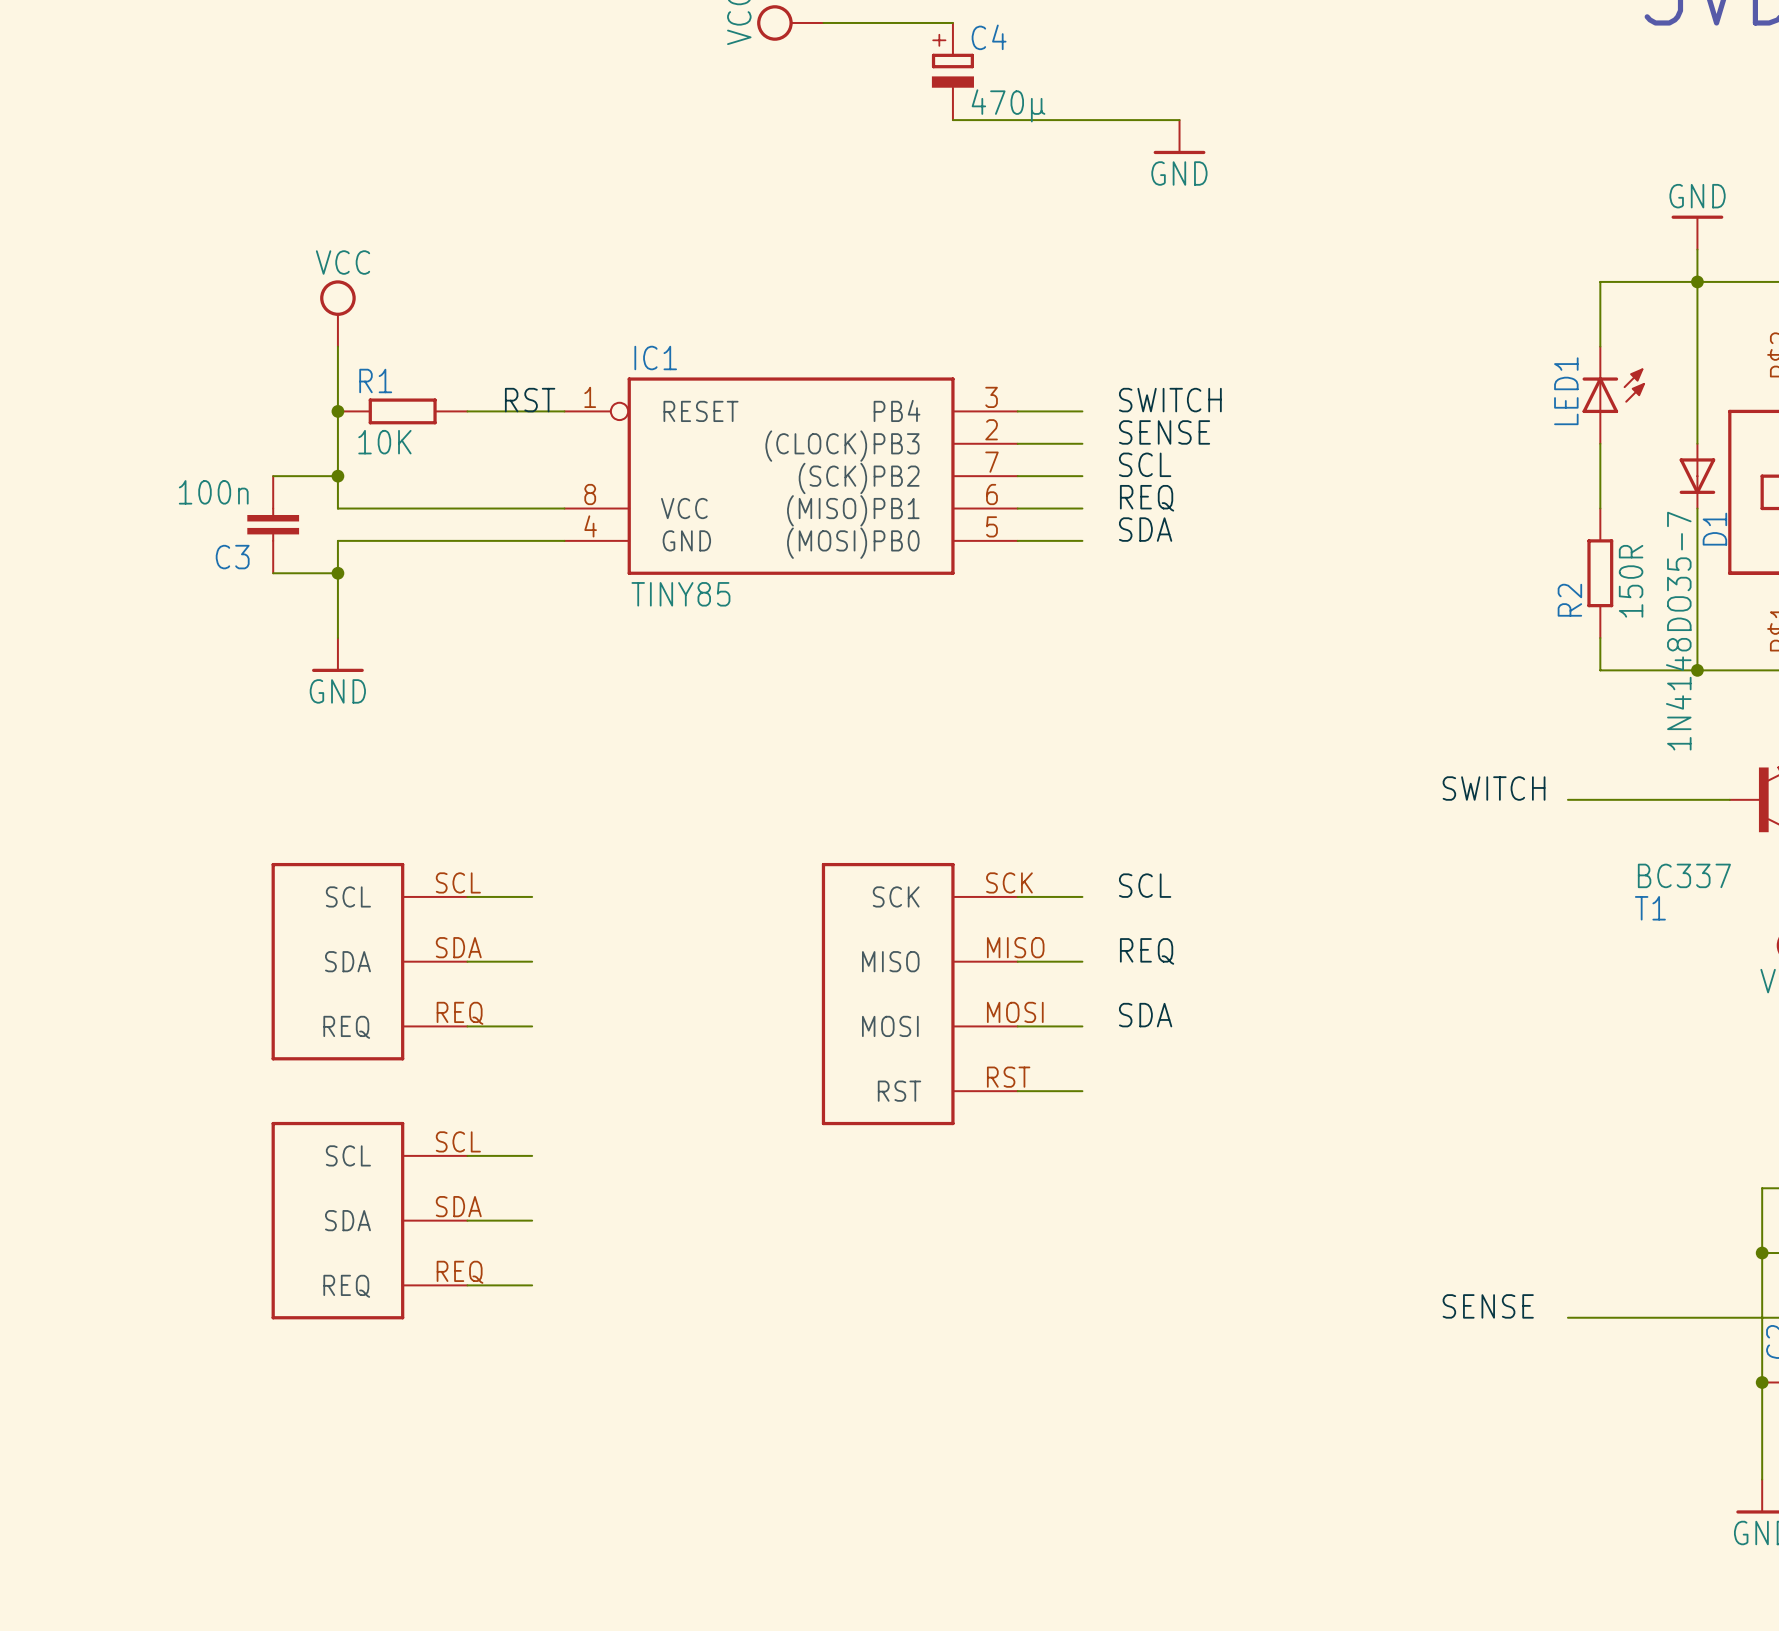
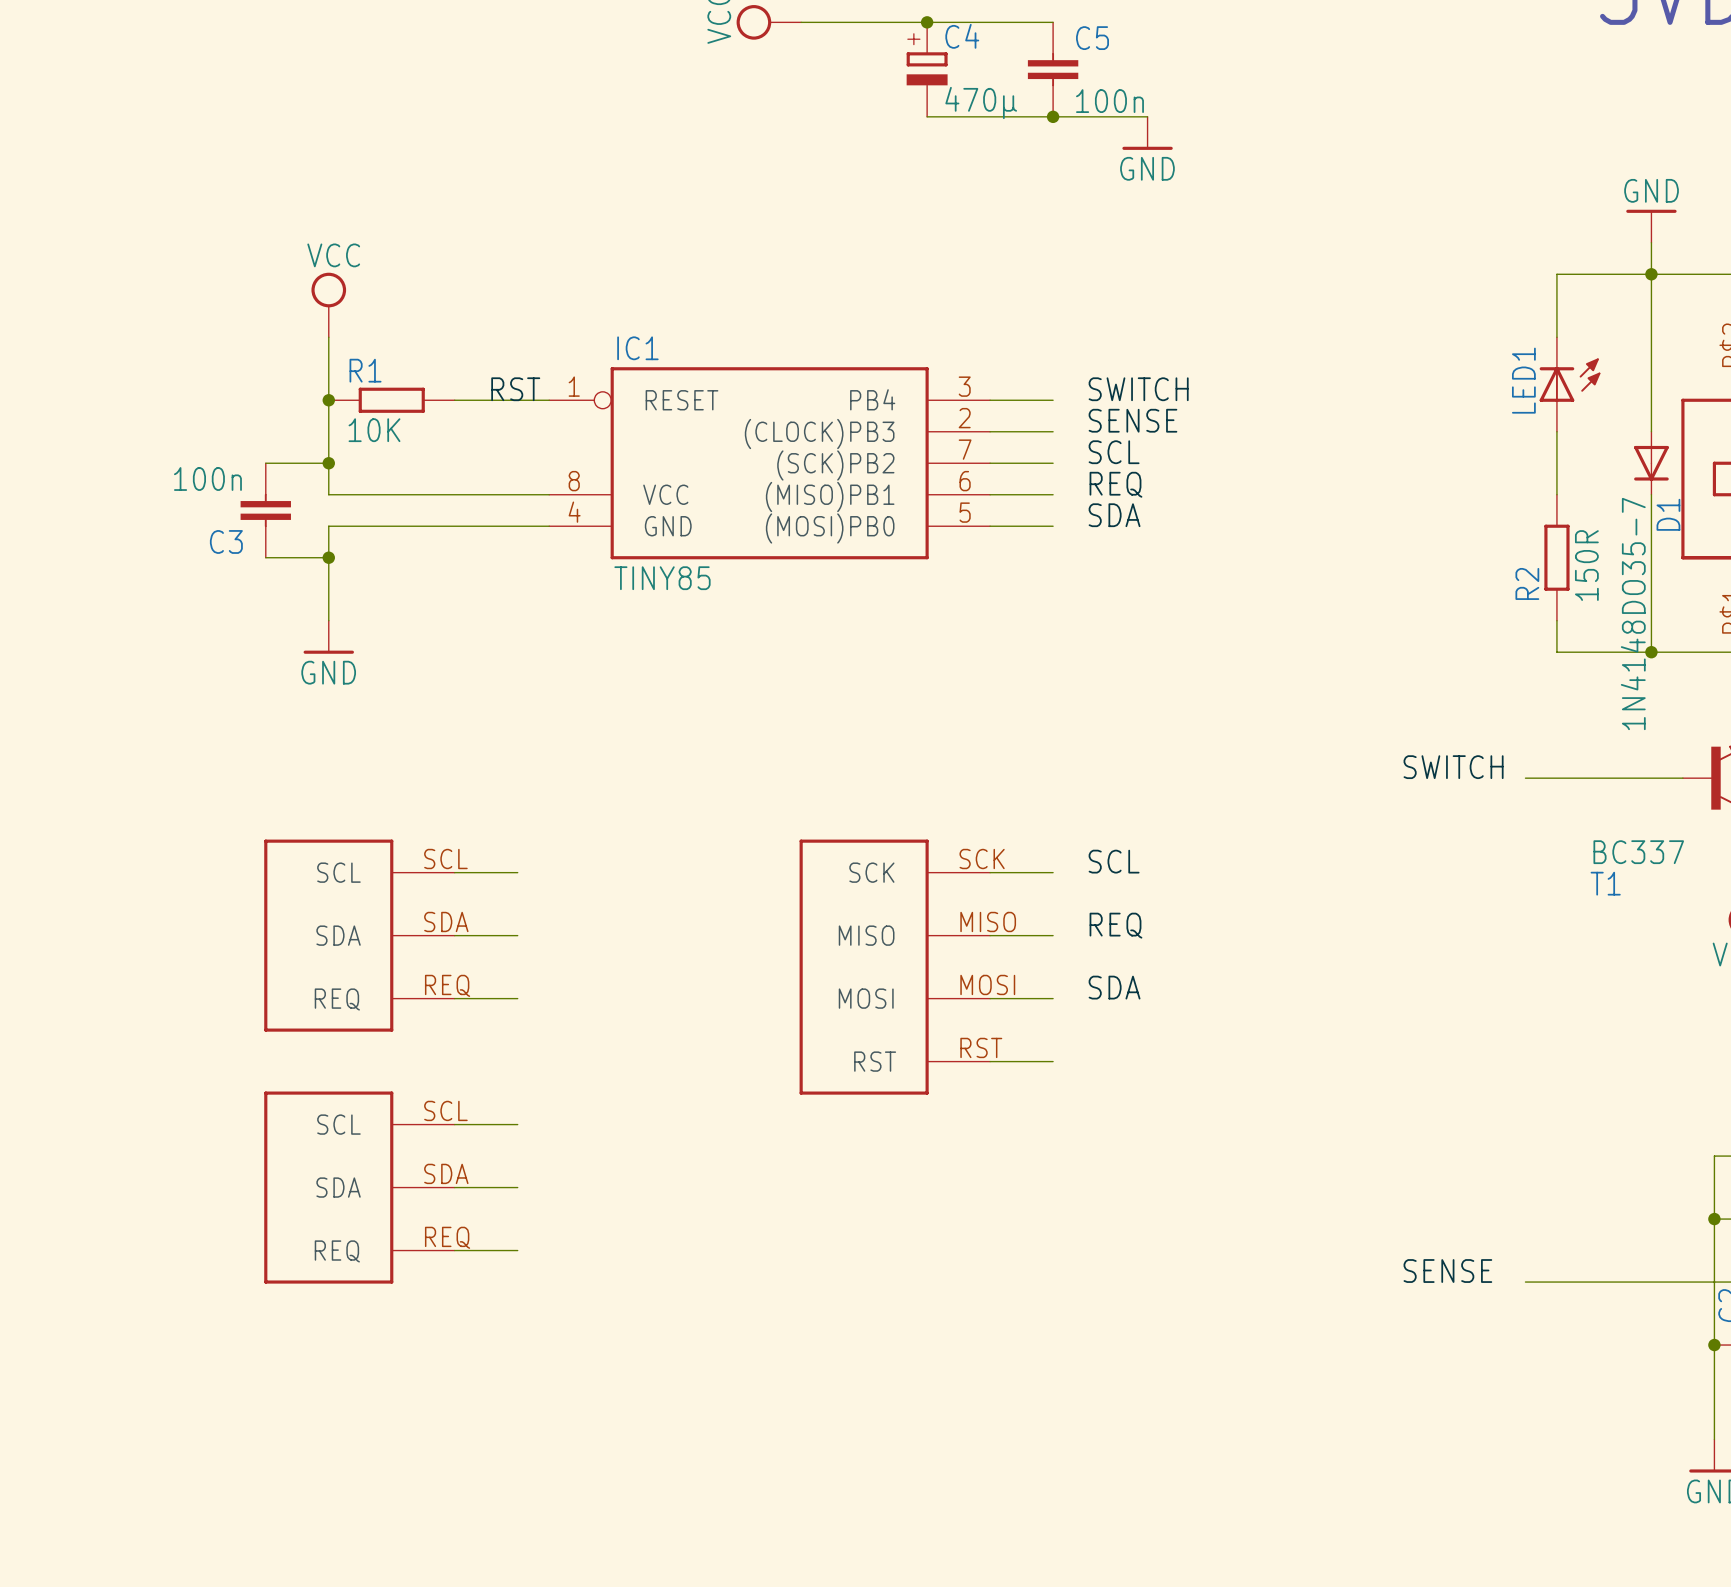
wire: none -> (927, 22) (1053, 22)
junction: none -> (927, 22)
C5: none -> 100n (1053, 69)
junction: none -> (1053, 116)

